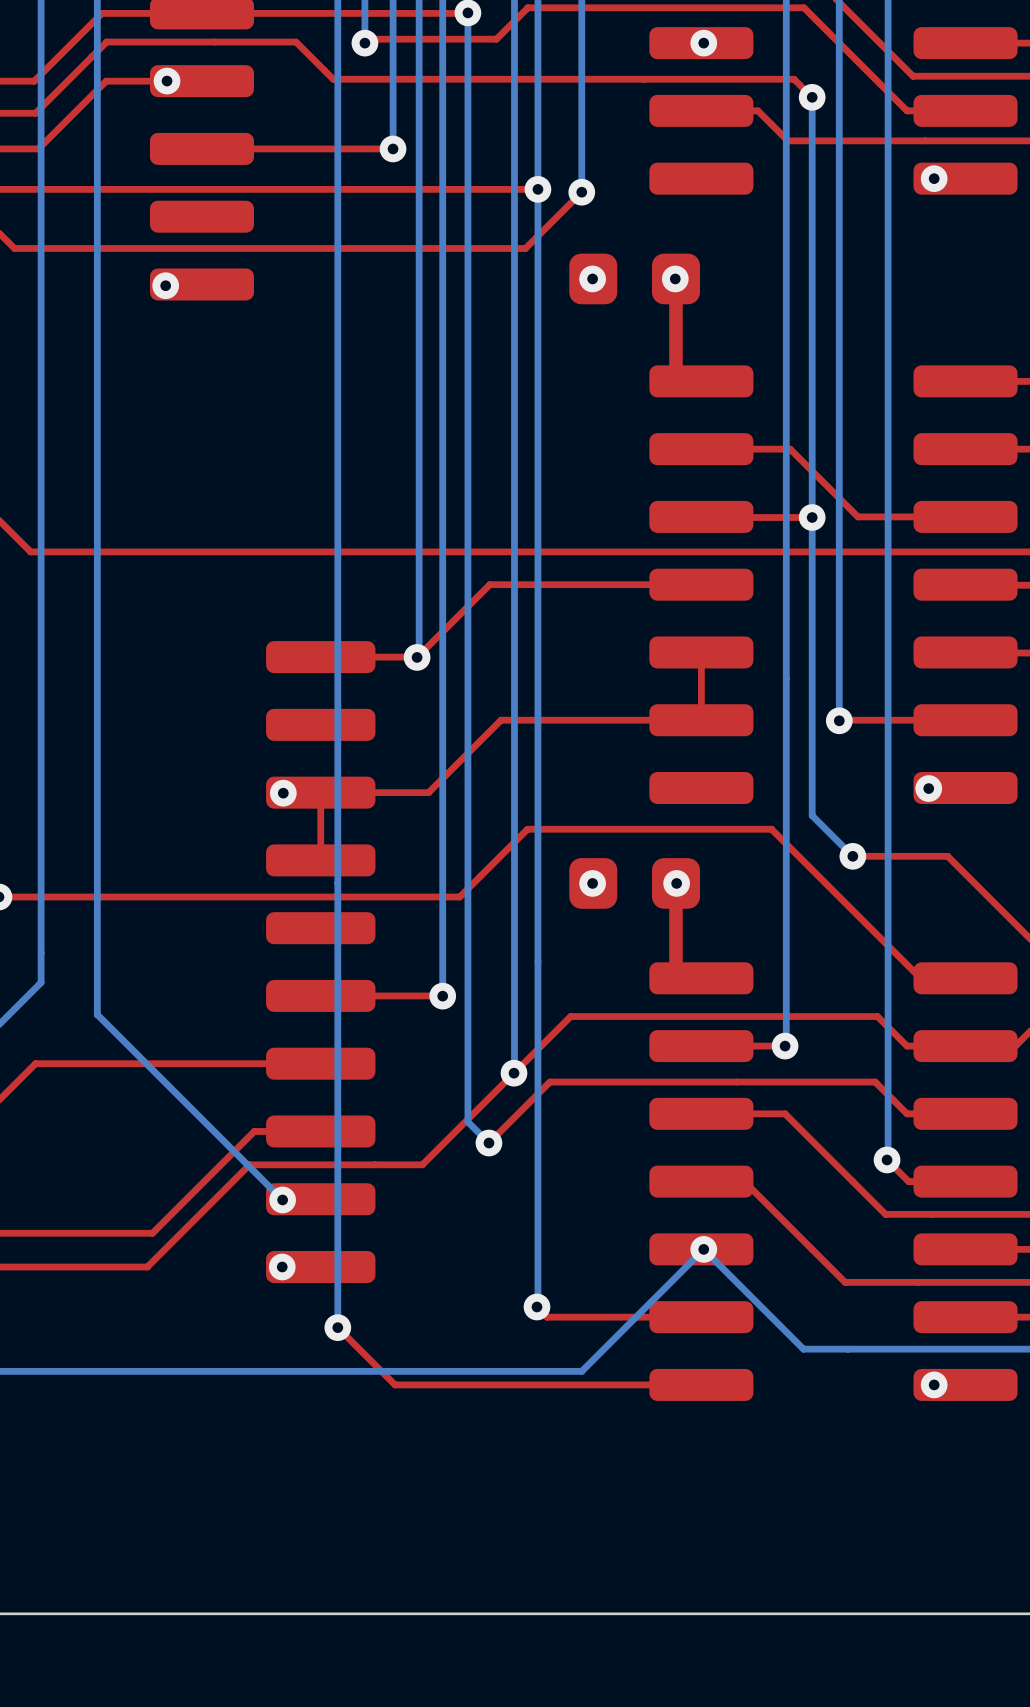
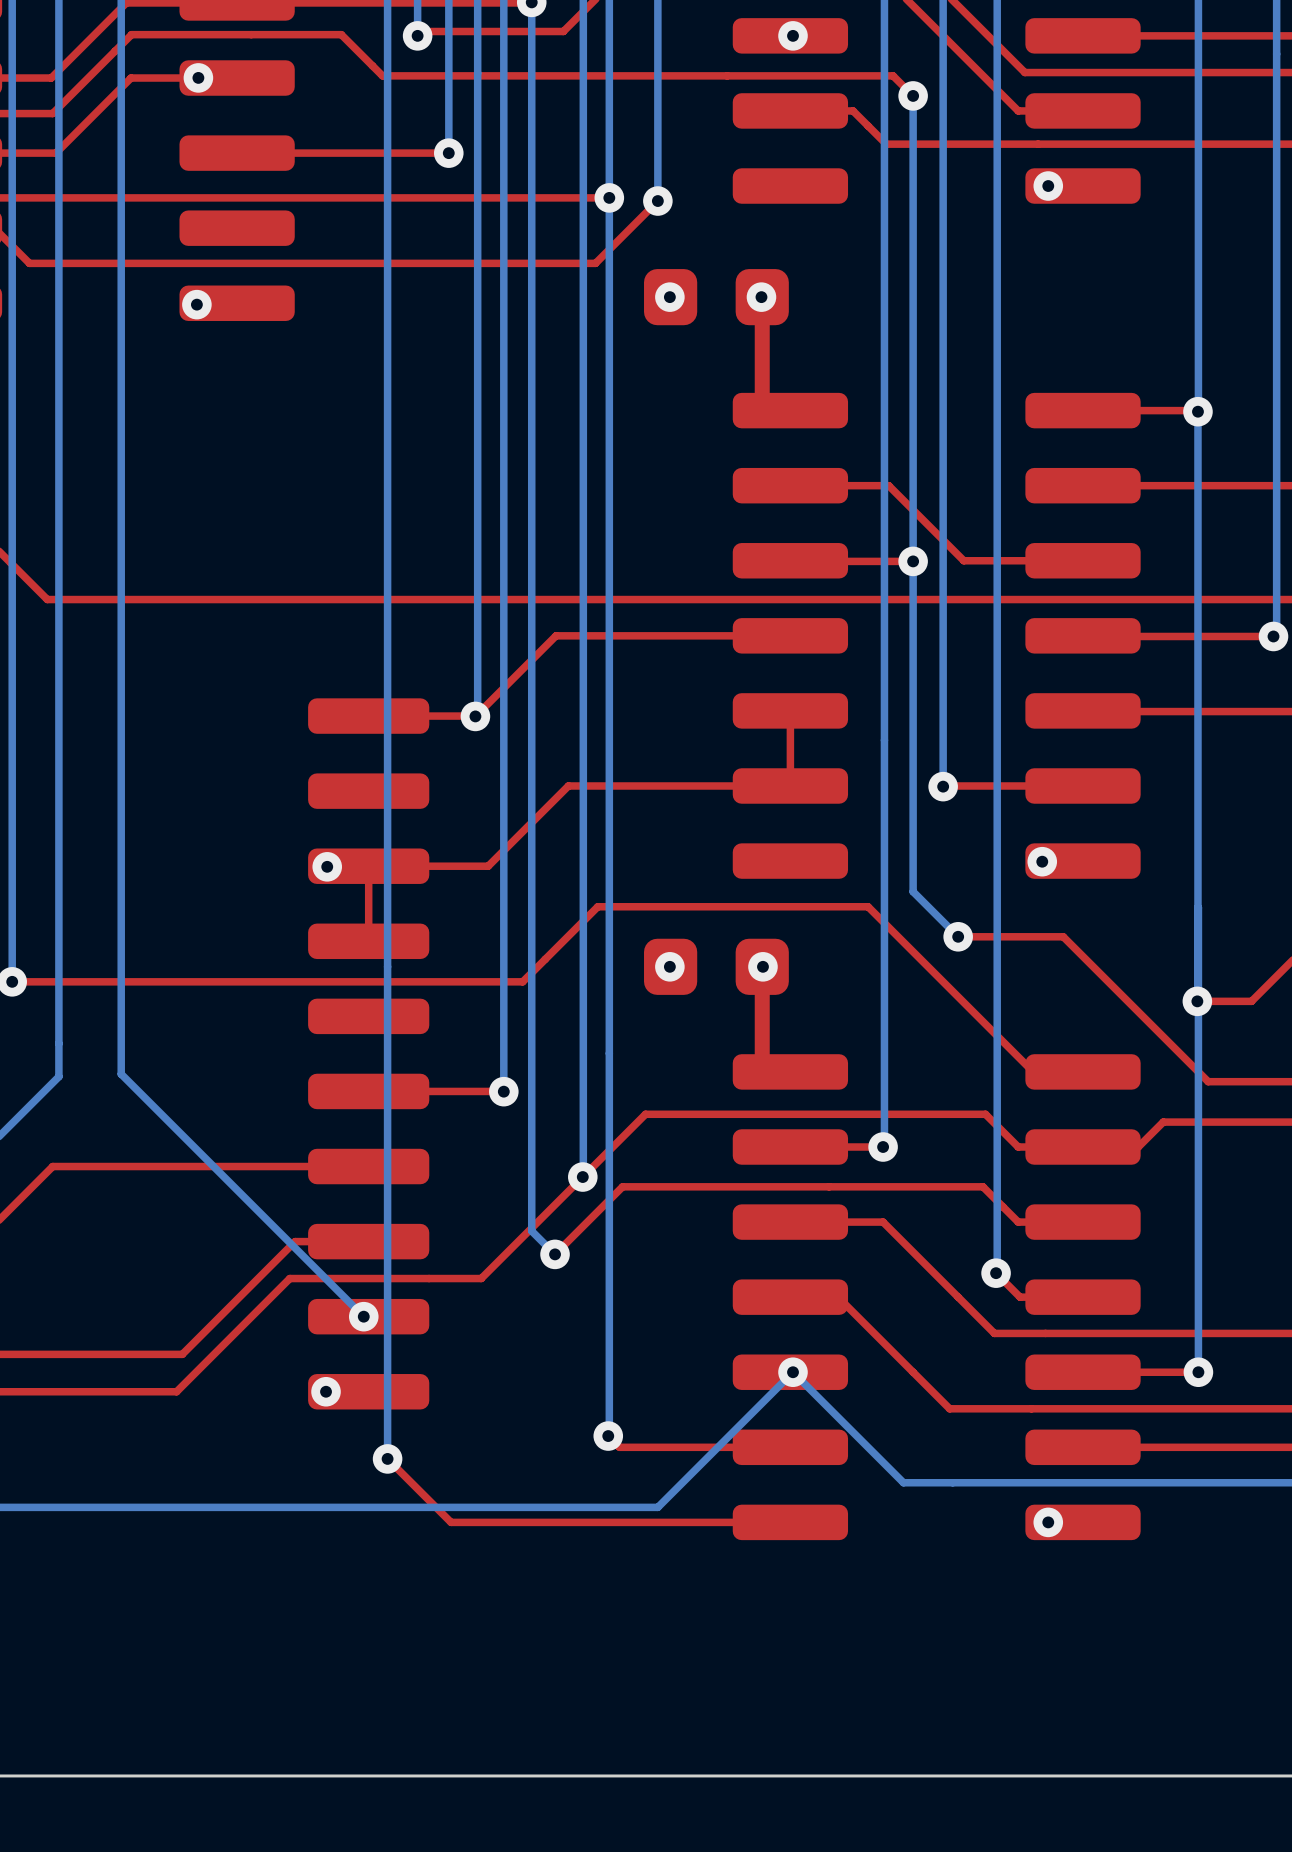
bottom track: (97, 980) (97, 1014) (282, 1199) -> (121, 1074) (363, 1316)
via position: (282, 1199) -> (363, 1316)

